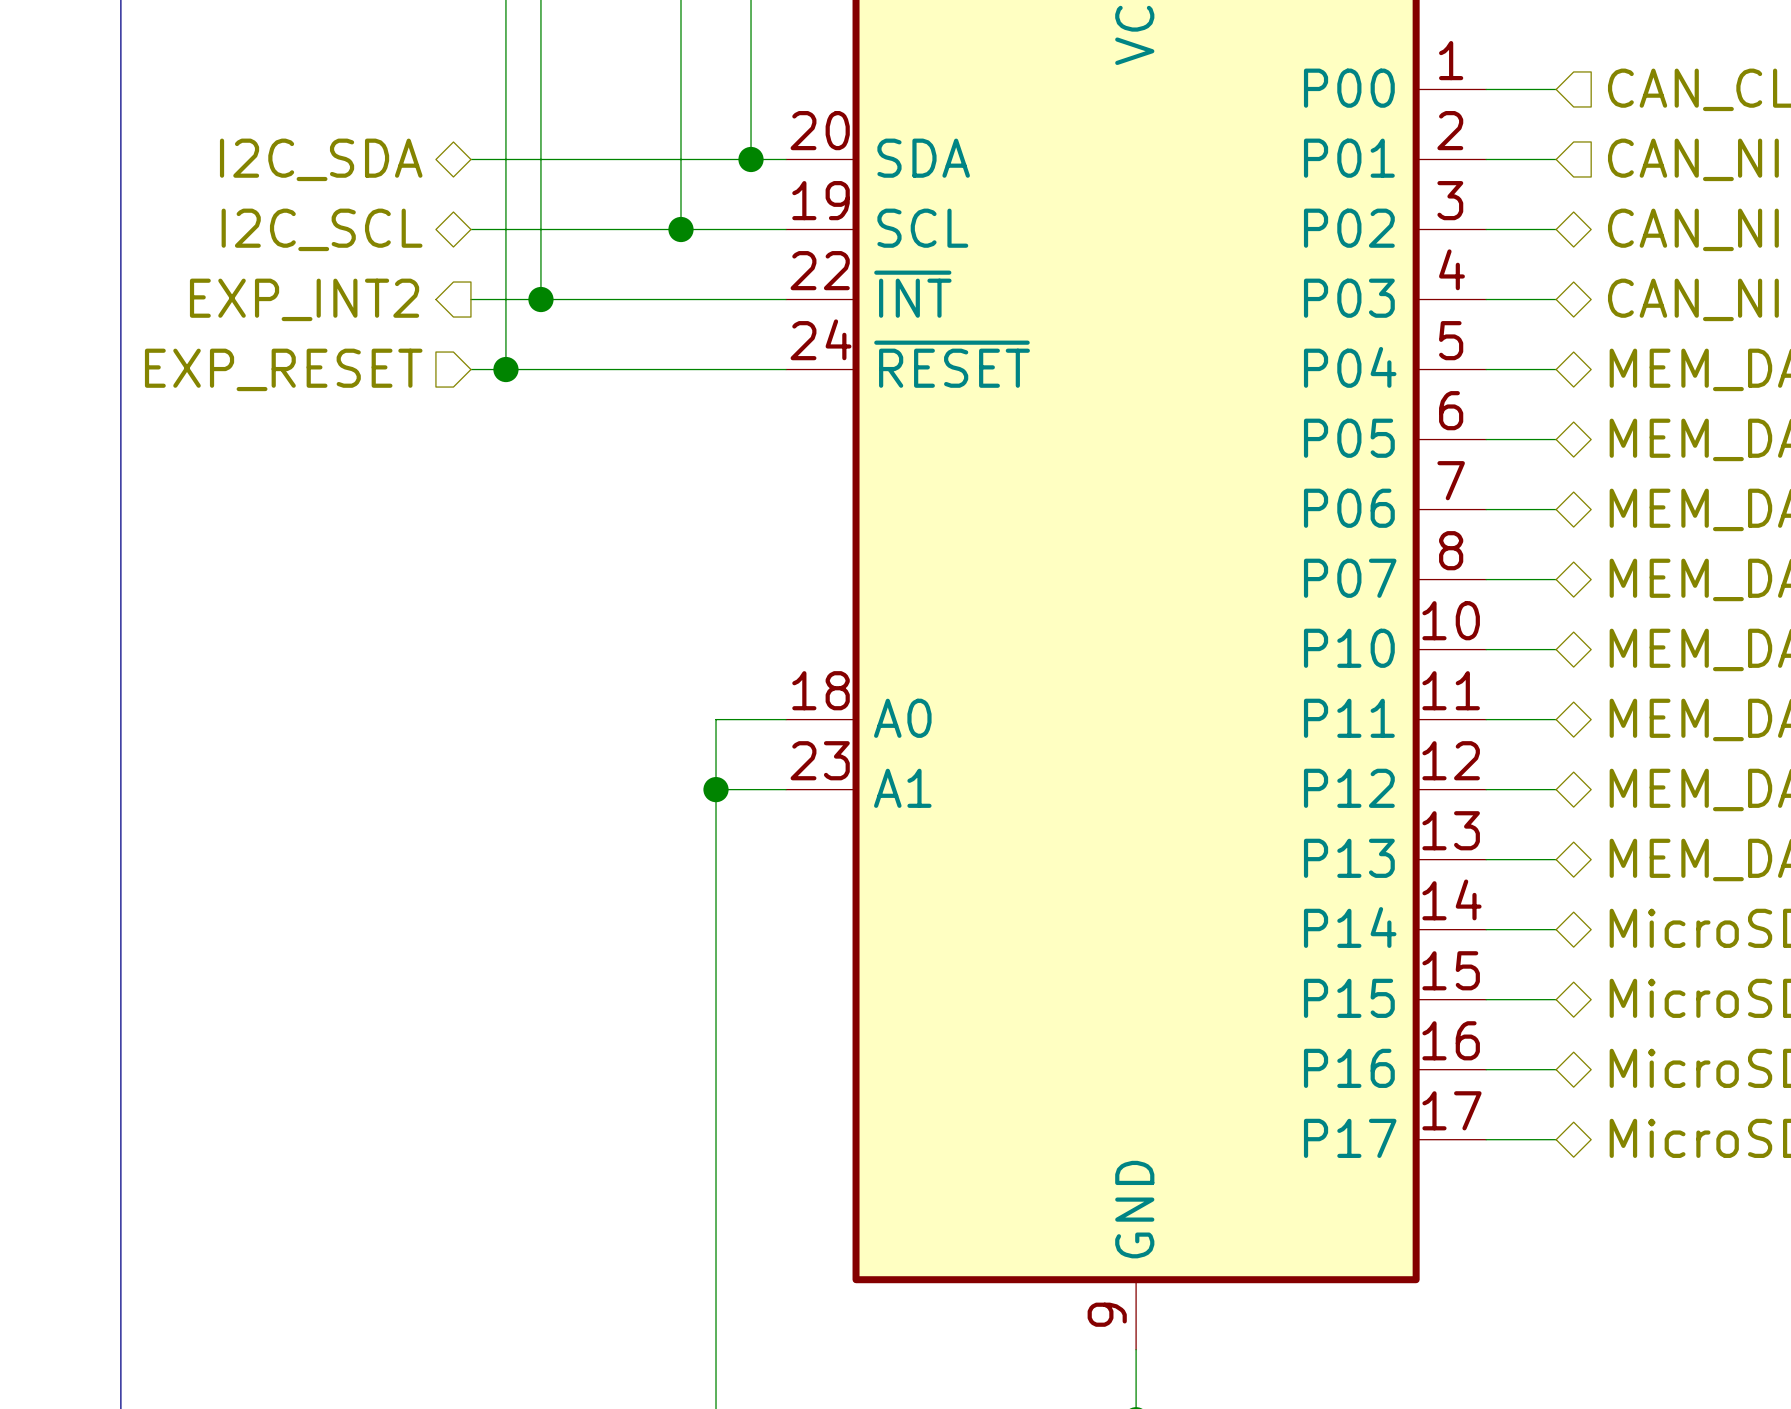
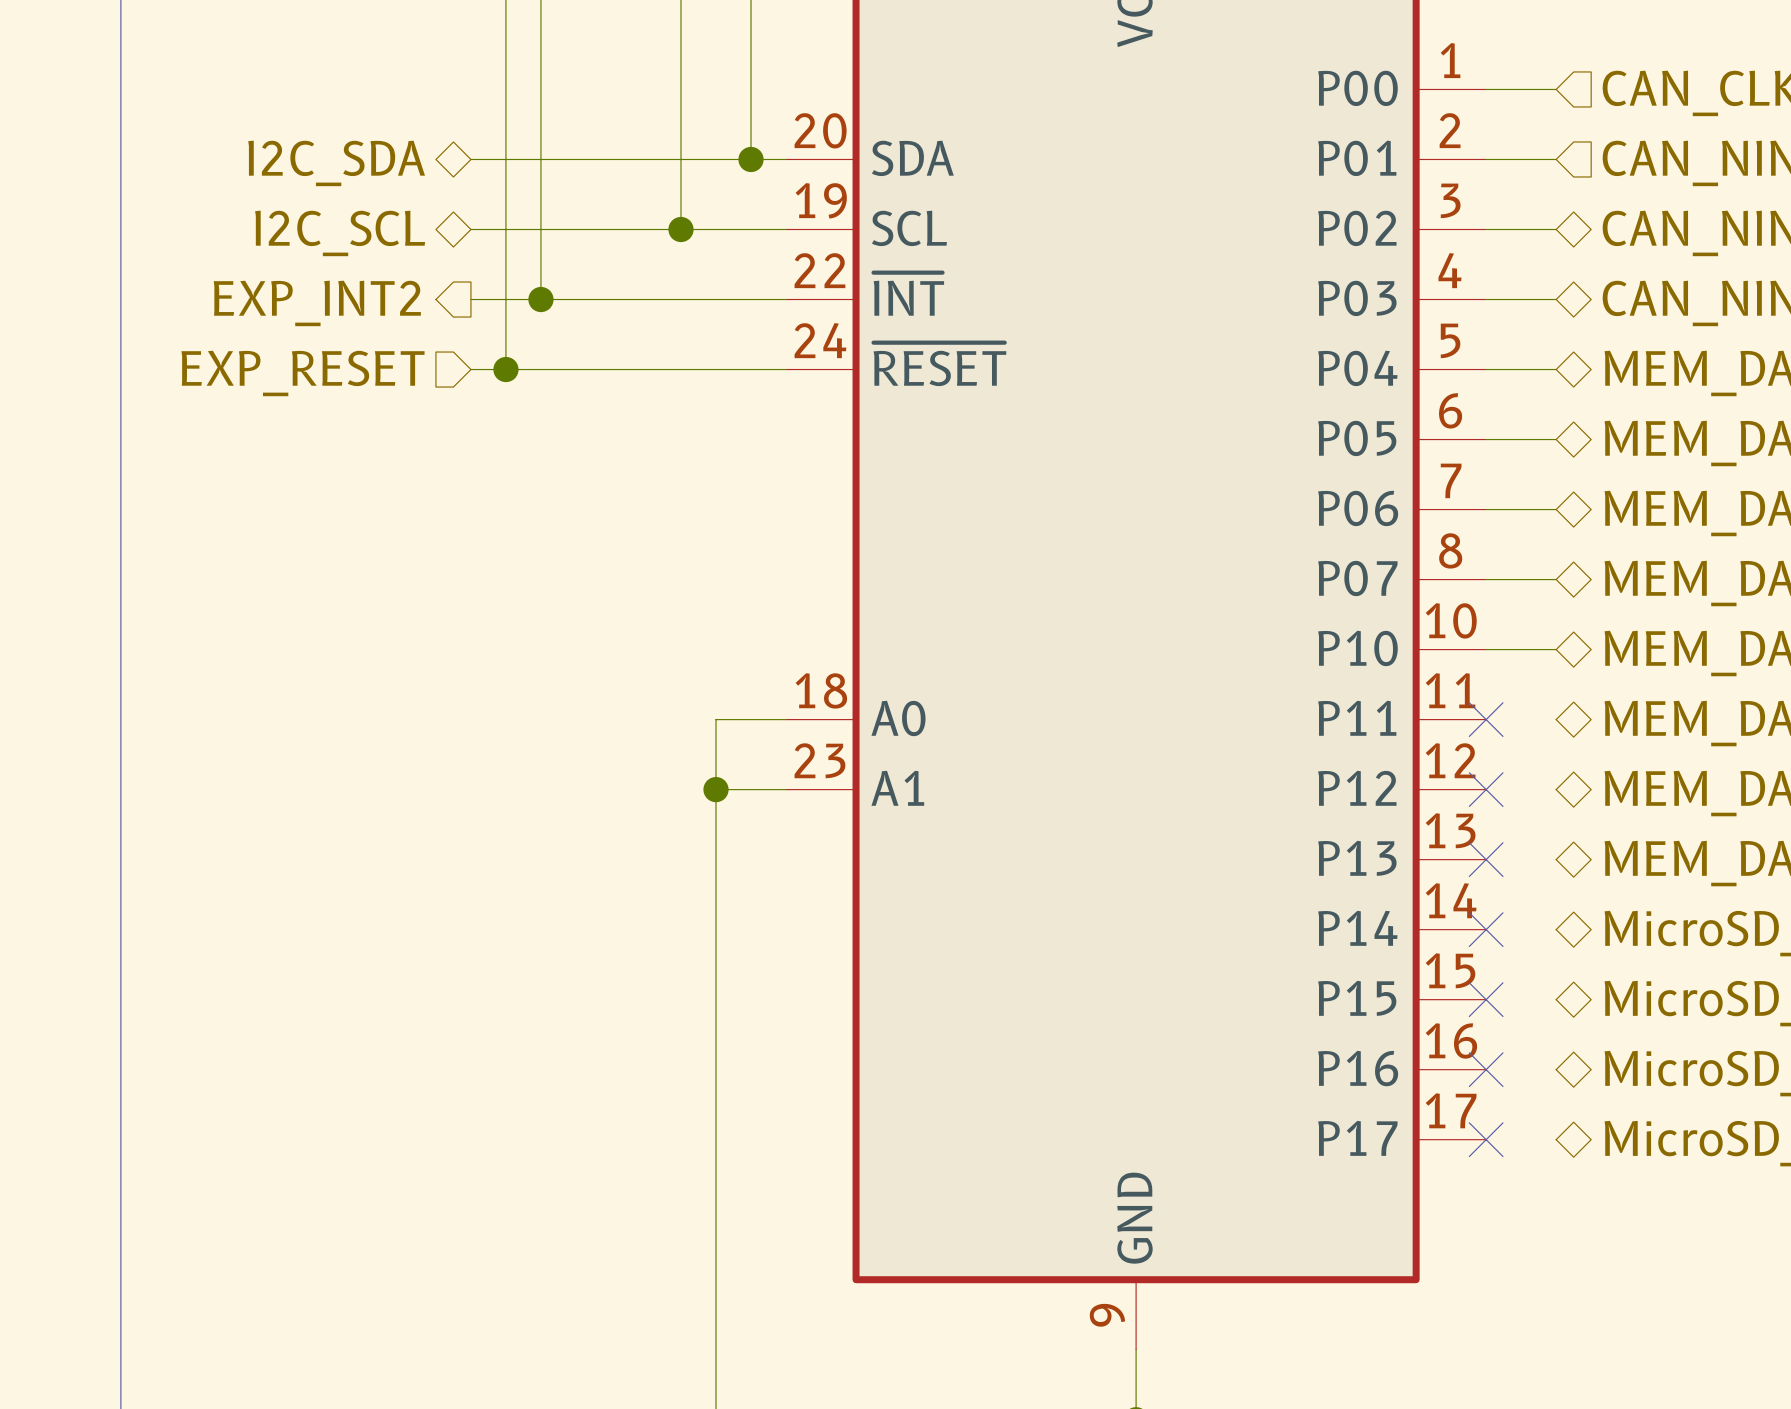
wire: (1486, 719) (1556, 719) -> none
no-connect mark: none -> (1486, 719)
wire: (1486, 789) (1556, 789) -> none
no-connect mark: none -> (1486, 789)
wire: (1486, 859) (1556, 859) -> none
no-connect mark: none -> (1486, 859)
wire: (1486, 929) (1556, 929) -> none
no-connect mark: none -> (1486, 929)
wire: (1486, 999) (1556, 999) -> none
no-connect mark: none -> (1486, 999)
wire: (1486, 1069) (1556, 1069) -> none
no-connect mark: none -> (1486, 1069)
wire: (1486, 1139) (1556, 1139) -> none
no-connect mark: none -> (1486, 1139)

